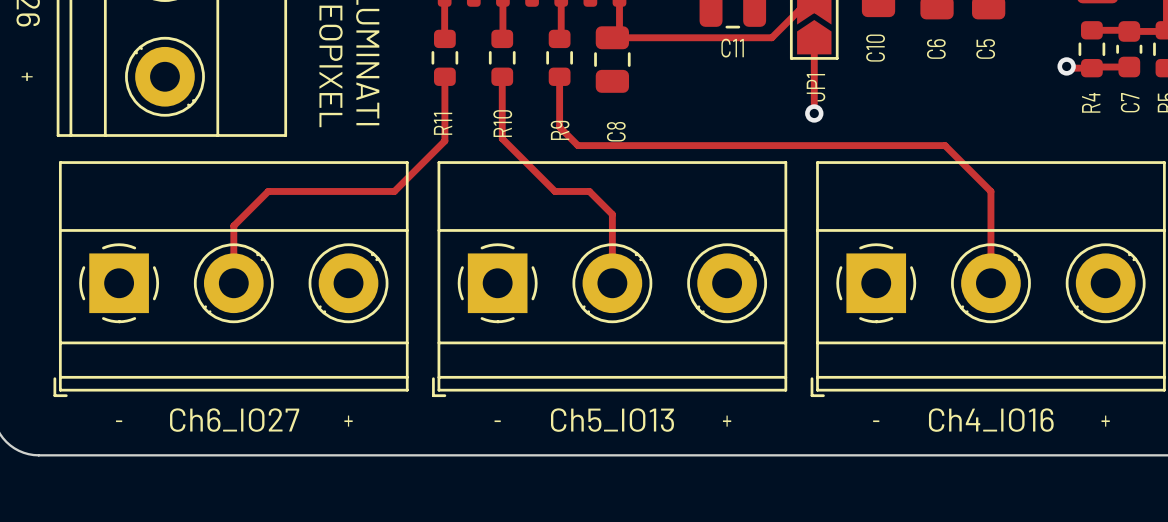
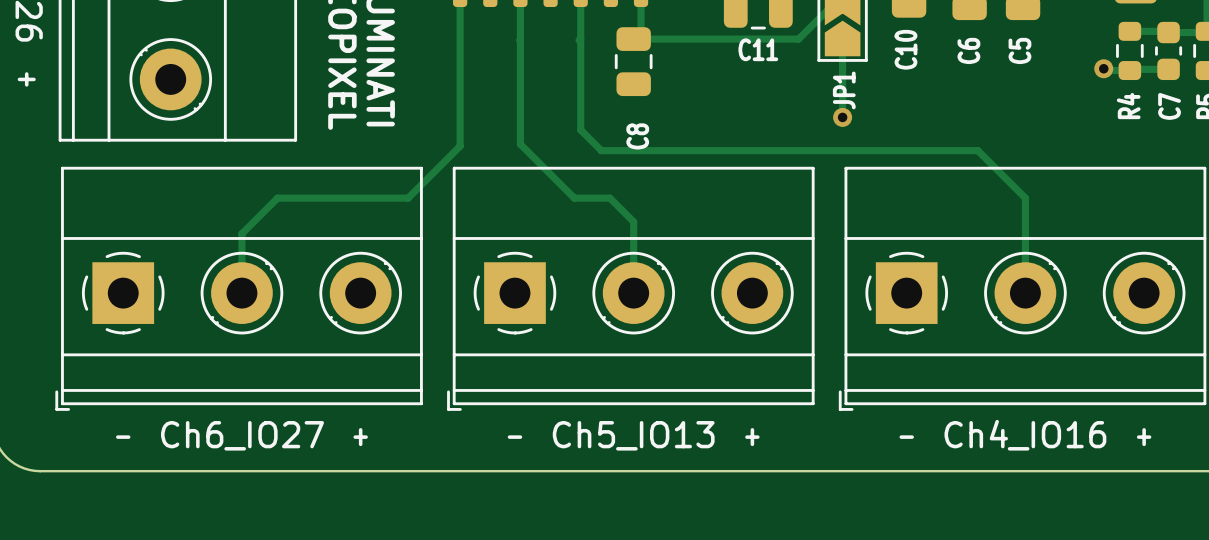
R11: (444, 57) -> none
R10: (502, 57) -> none
R9: (559, 57) -> none
track: (444, 76) (444, 141) -> (460, 40) (460, 146)
track: (502, 76) (502, 139) -> (520, 39) (520, 144)
track: (559, 76) (559, 127) (577, 145) (581, 145) -> (580, 38) (580, 130) (601, 150)

